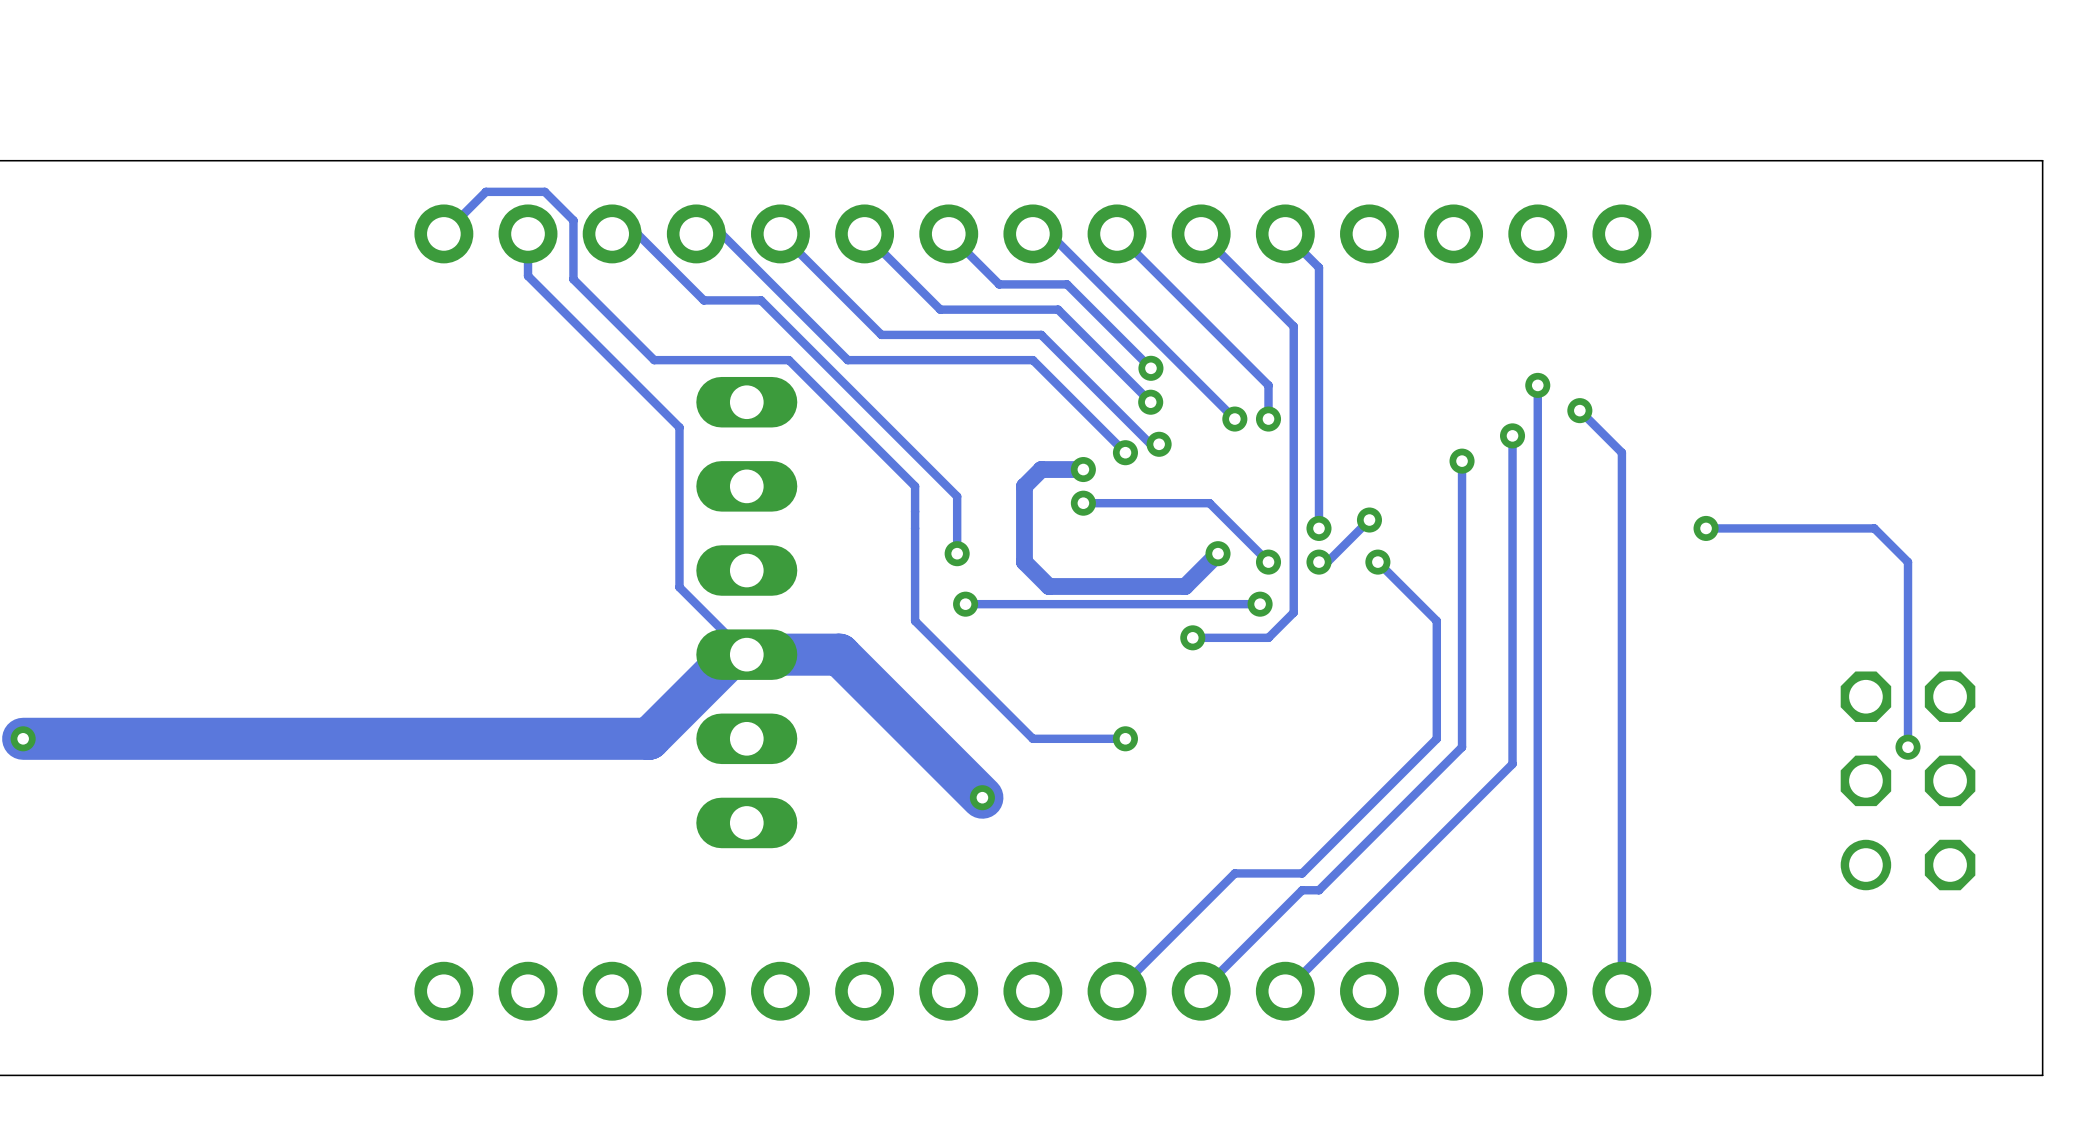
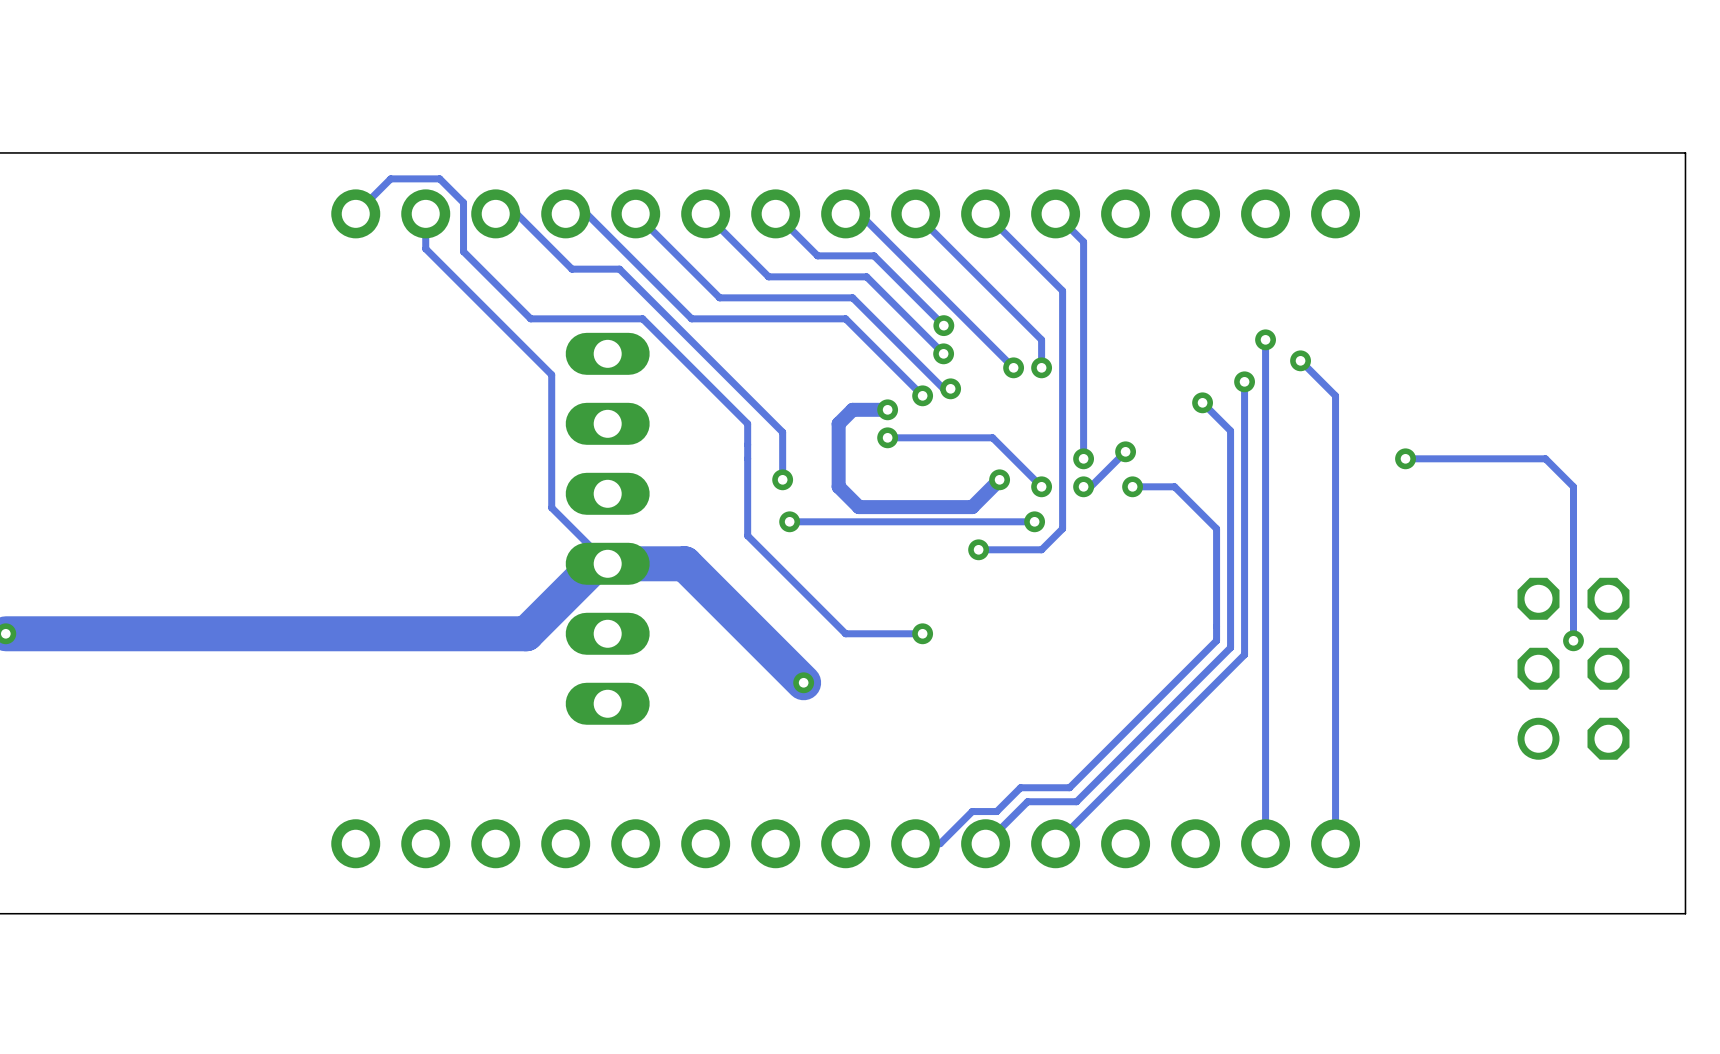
track: (1462, 461) (1462, 747) (1318, 890) (1302, 890) (1251, 940) -> (1202, 402) (1230, 430) (1230, 647) (1076, 801) (1027, 801)
track: (1377, 562) (1436, 621) (1436, 738) (1302, 873) (1234, 873) (1117, 991) -> (1132, 486) (1174, 486) (1216, 528) (1216, 640) (1069, 787) (1020, 787) (996, 811) (972, 811) (940, 843) (915, 843)

